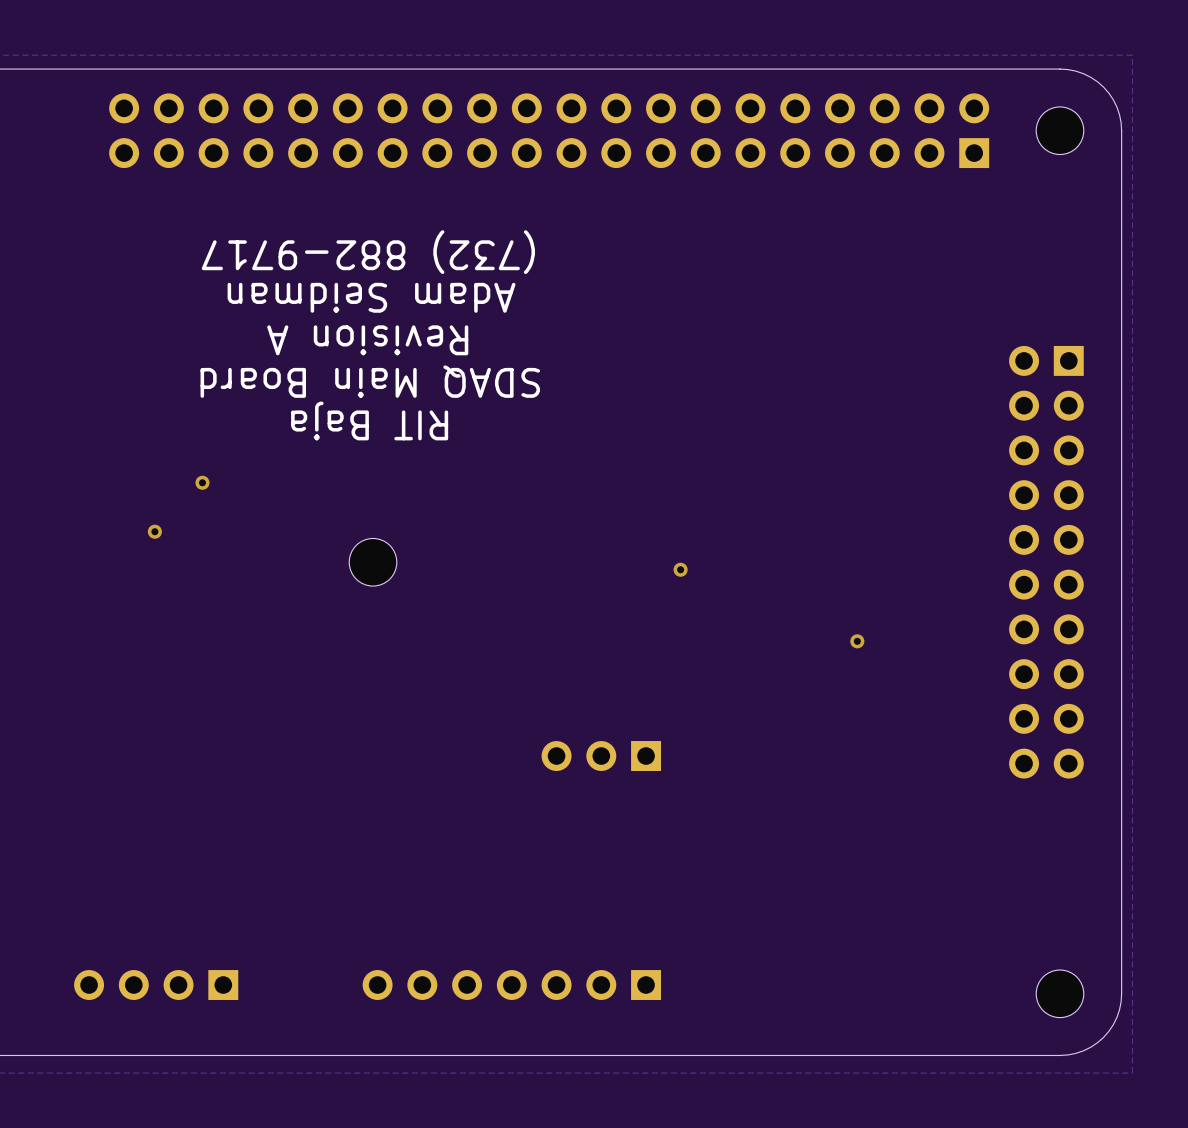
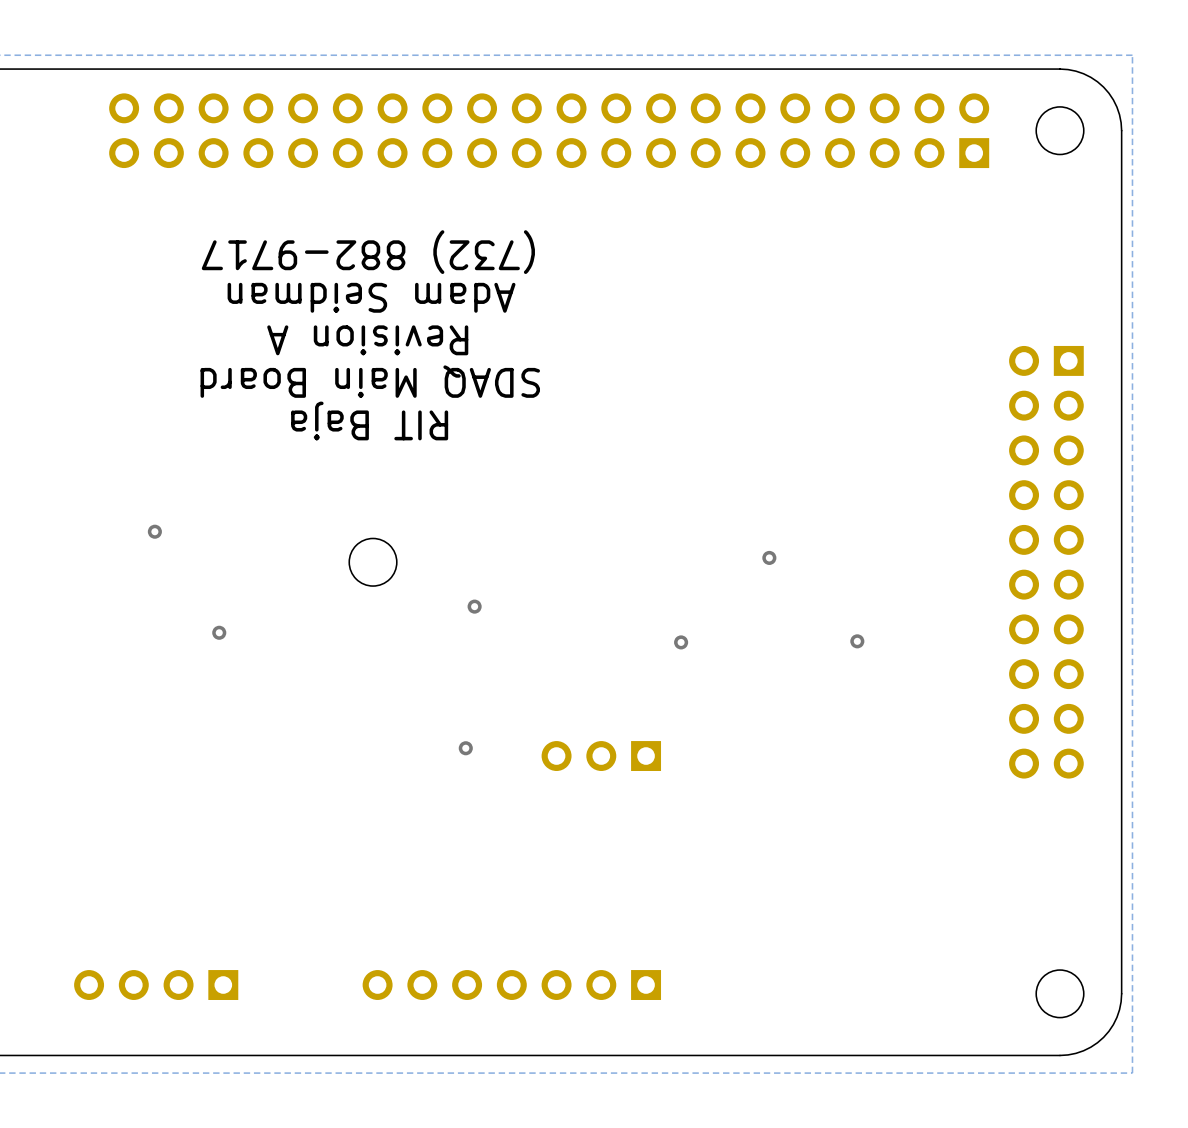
via: (202, 482) -> none
via: none -> (769, 557)
via: (680, 569) -> none
via: none -> (474, 606)
via: none -> (219, 632)
via: none -> (681, 642)
via: none -> (465, 748)

